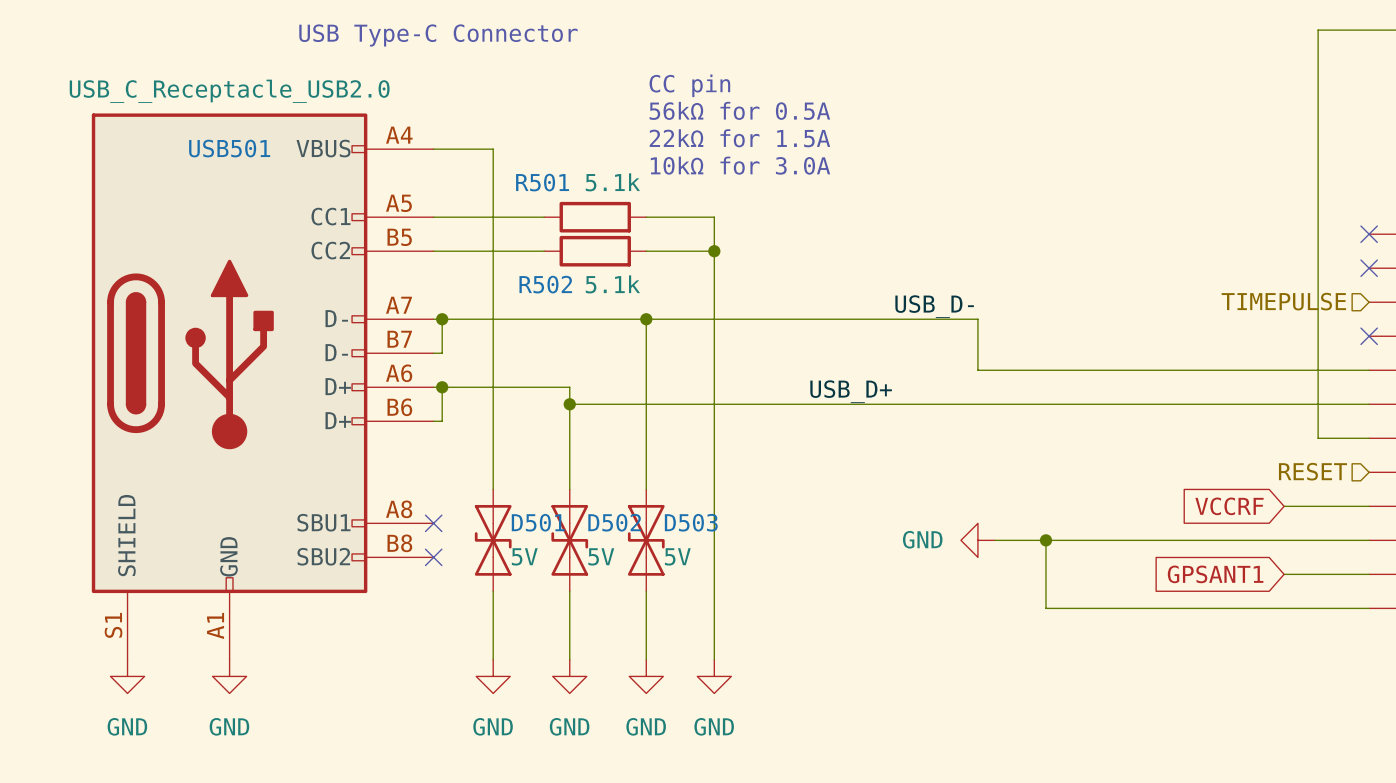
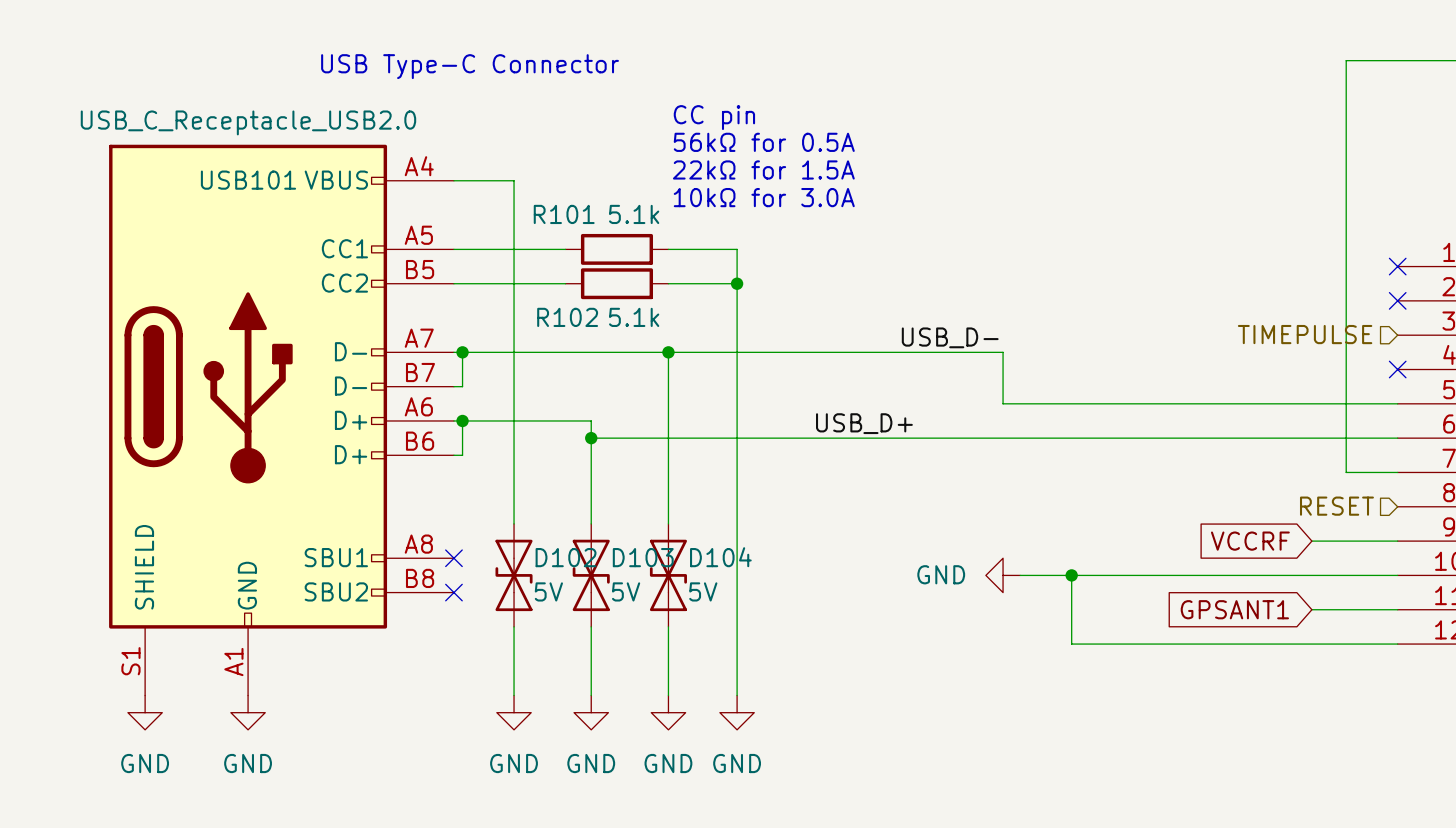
USB501 name: USB501 (229, 148) -> USB101 (248, 180)
R501 name: R501 (542, 182) -> R101 (564, 214)
R502 name: R502 (545, 284) -> R102 (567, 317)
D501 name: D501 (538, 522) -> D102 (566, 557)
D502 name: D502 (614, 522) -> D103 (643, 557)
D503 name: D503 (691, 522) -> D104 (720, 557)

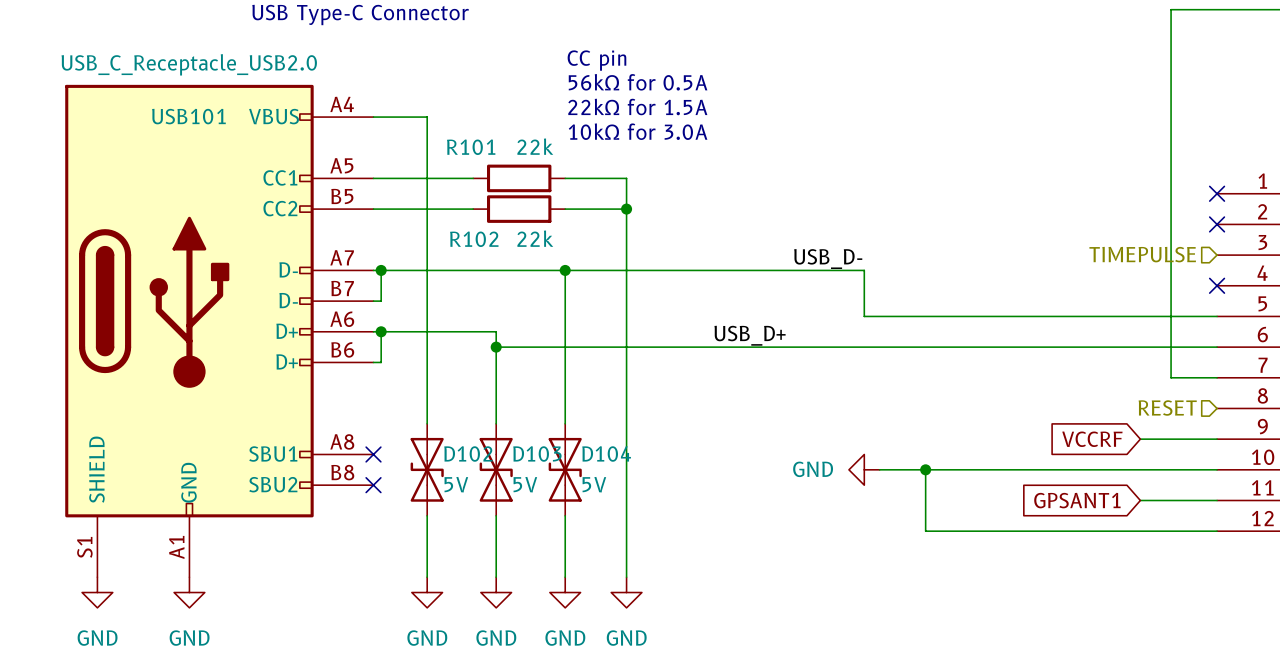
R101 value: 5.1k (634, 214) -> 22k (535, 146)
R102 value: 5.1k (634, 317) -> 22k (535, 238)

